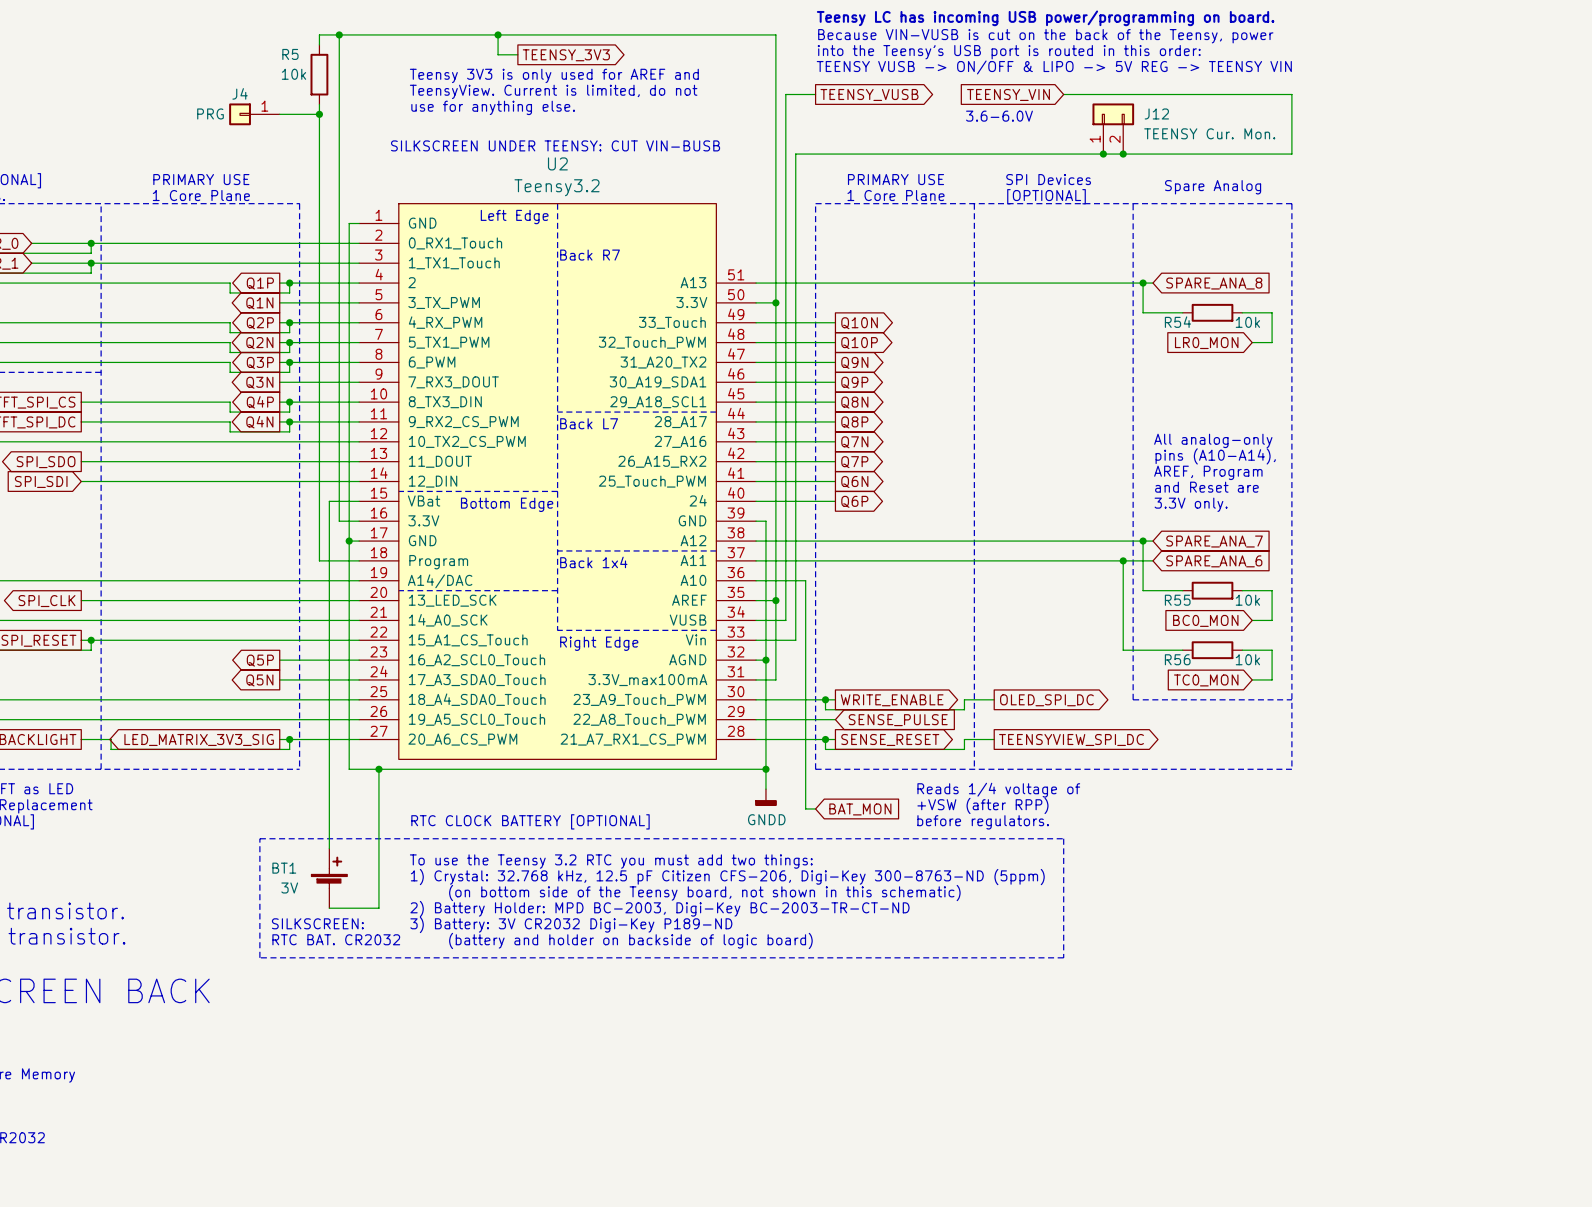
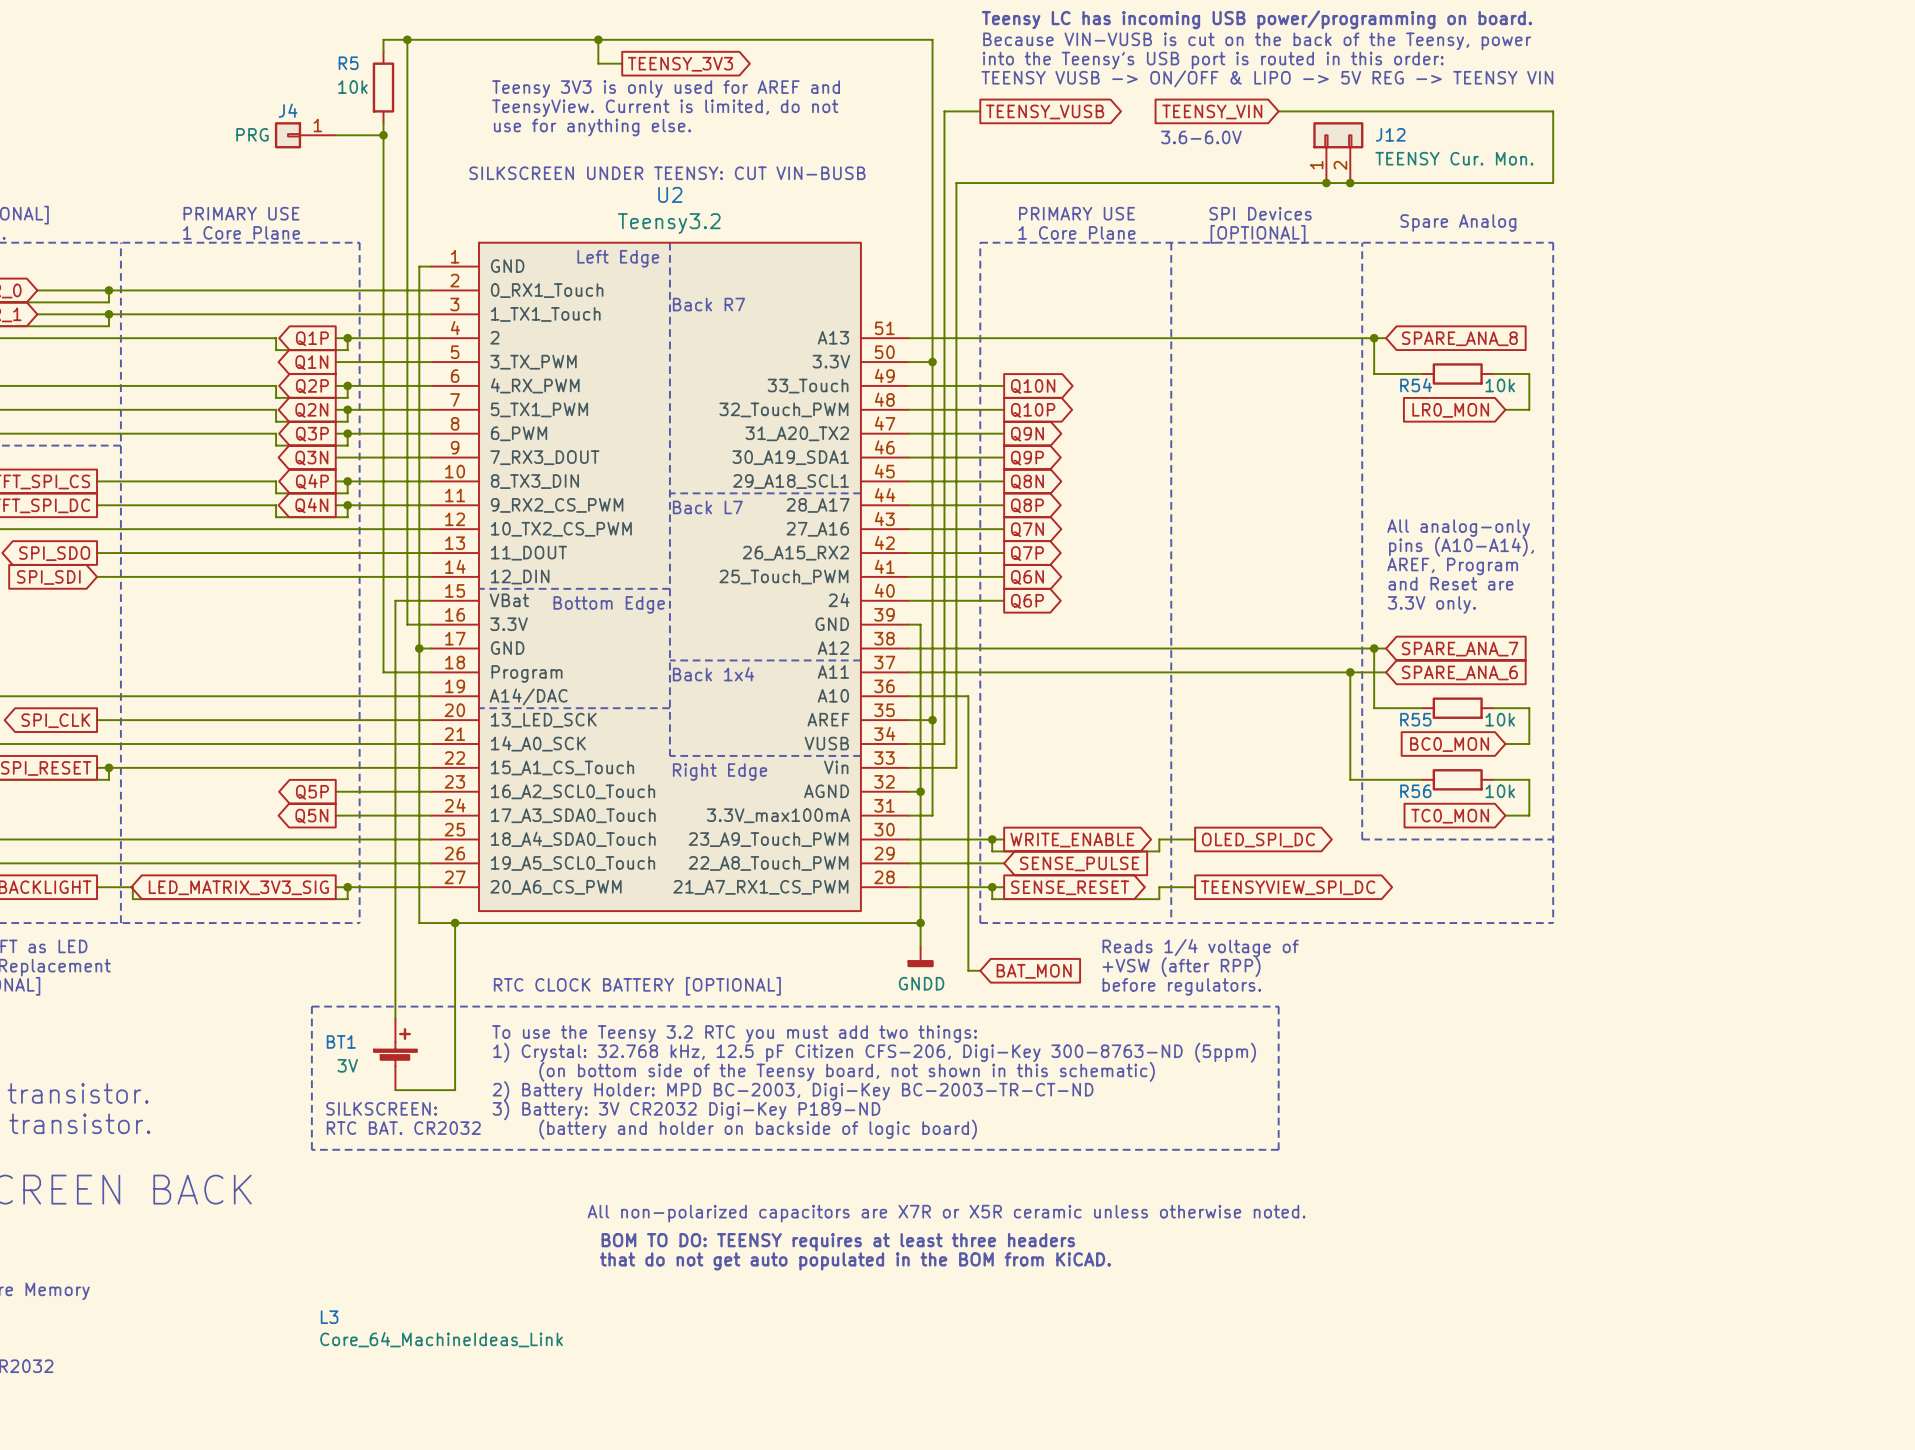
text: none -> All non-polarized capacitors are X7R or X5R ceramic unless otherwise noted. (946, 1213)
text: none -> BOM TO DO: TEENSY requires at least three headers (838, 1242)
text: none -> that do not get auto populated in the BOM from KiCAD. (855, 1261)
L3: none -> Core_64_MachineIdeas_Link (441, 1328)

